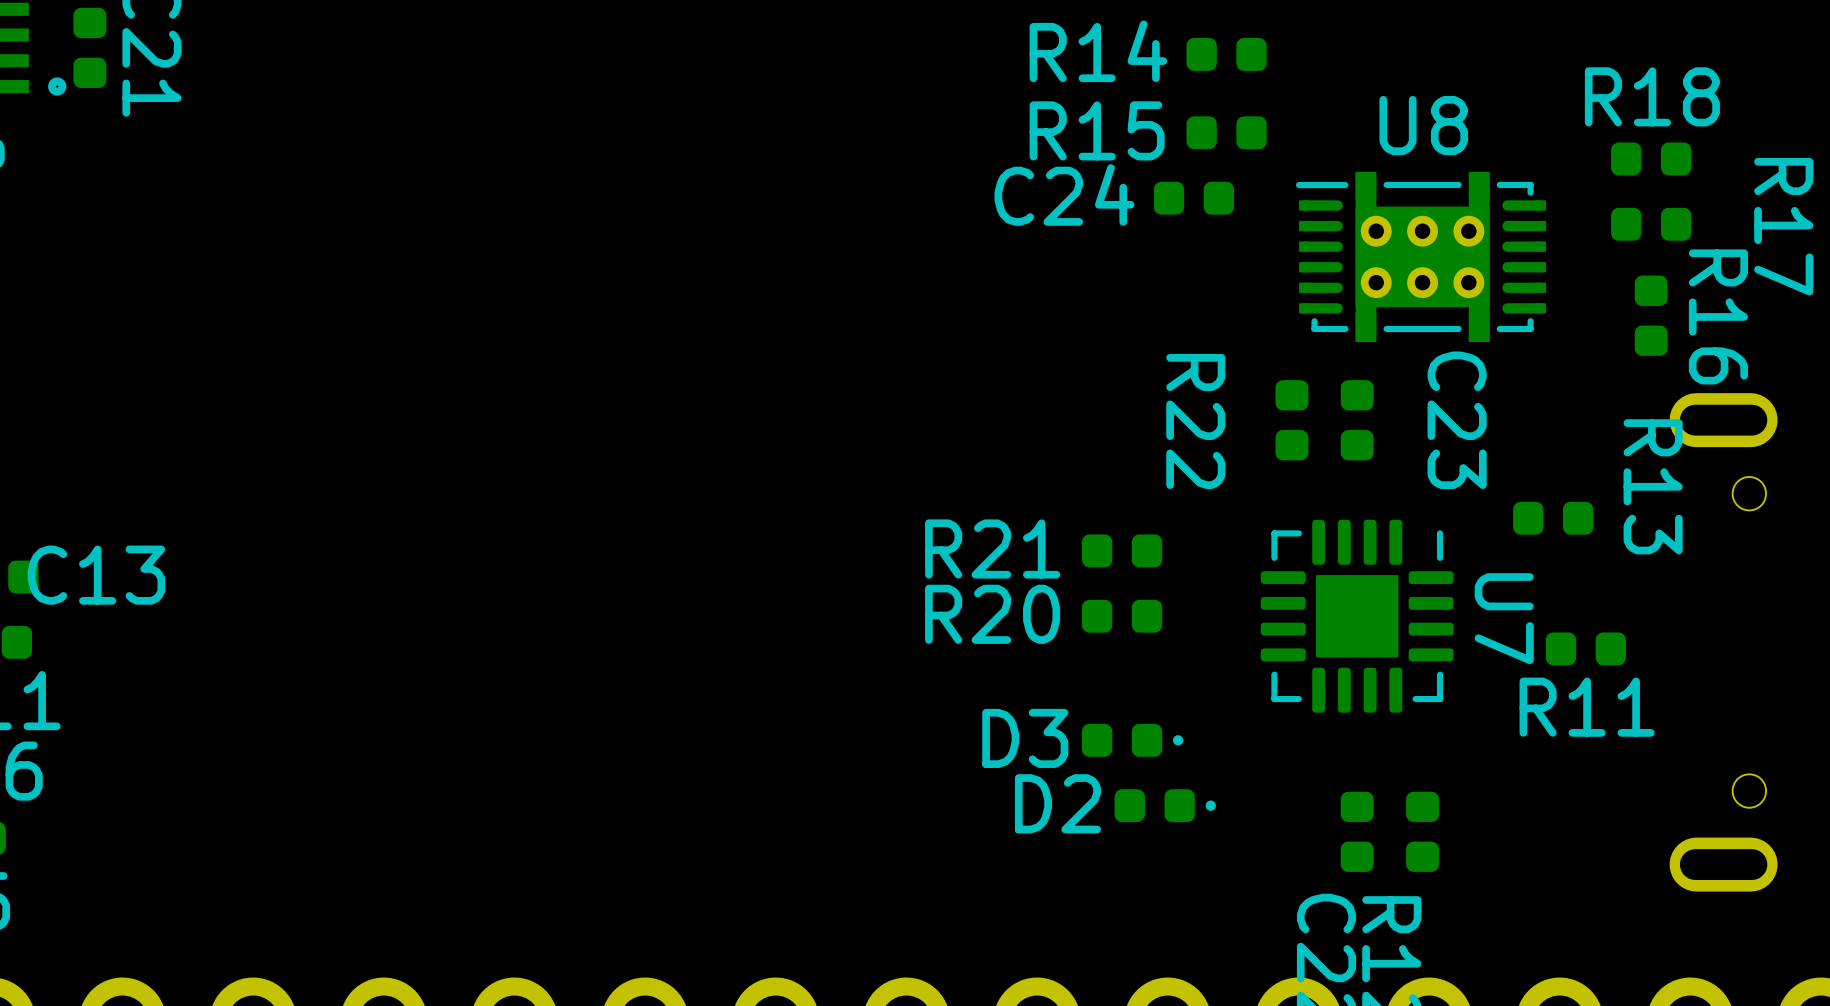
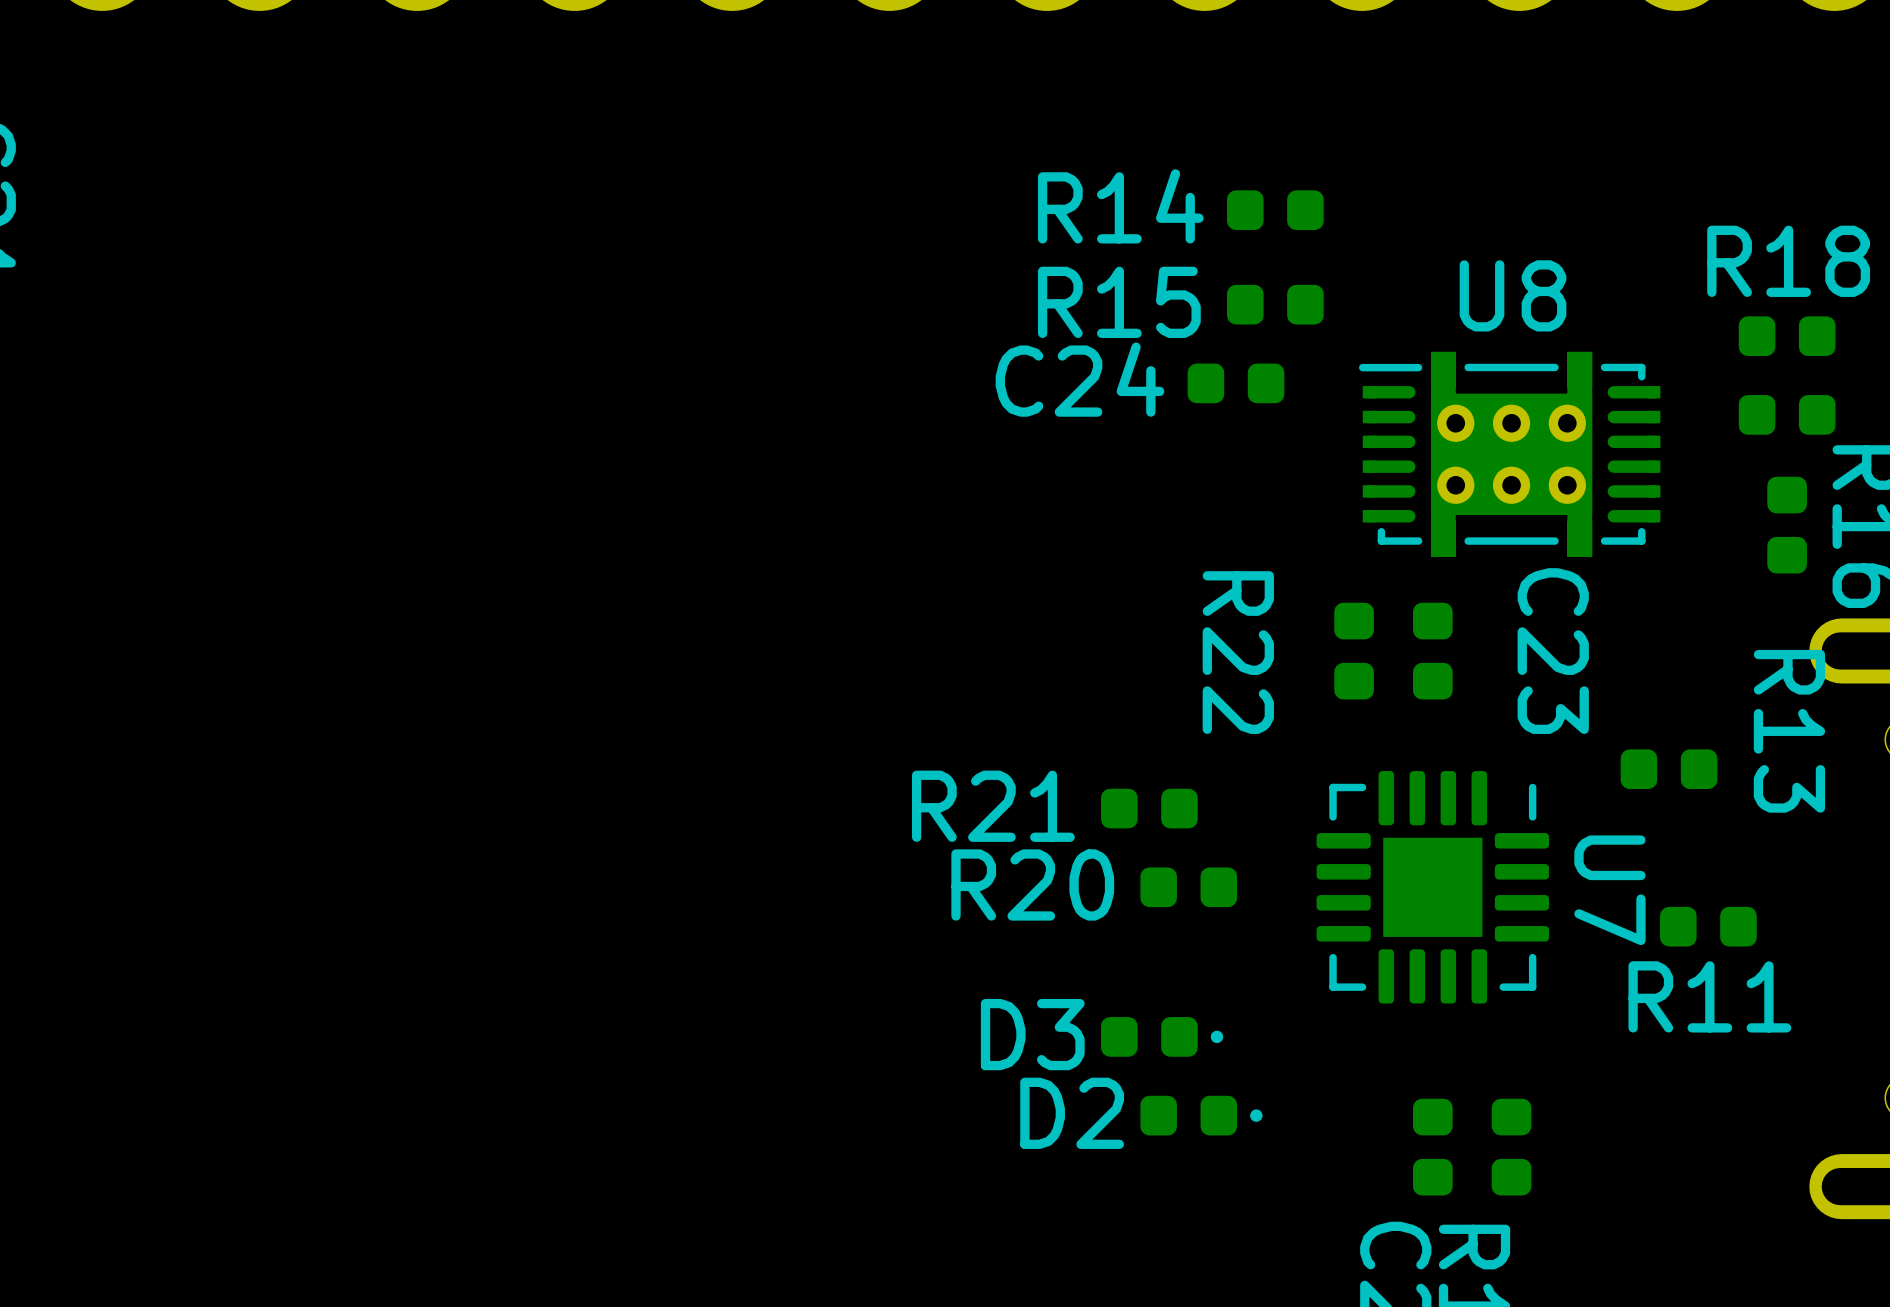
R20 position: (1122, 616) -> (1188, 887)

